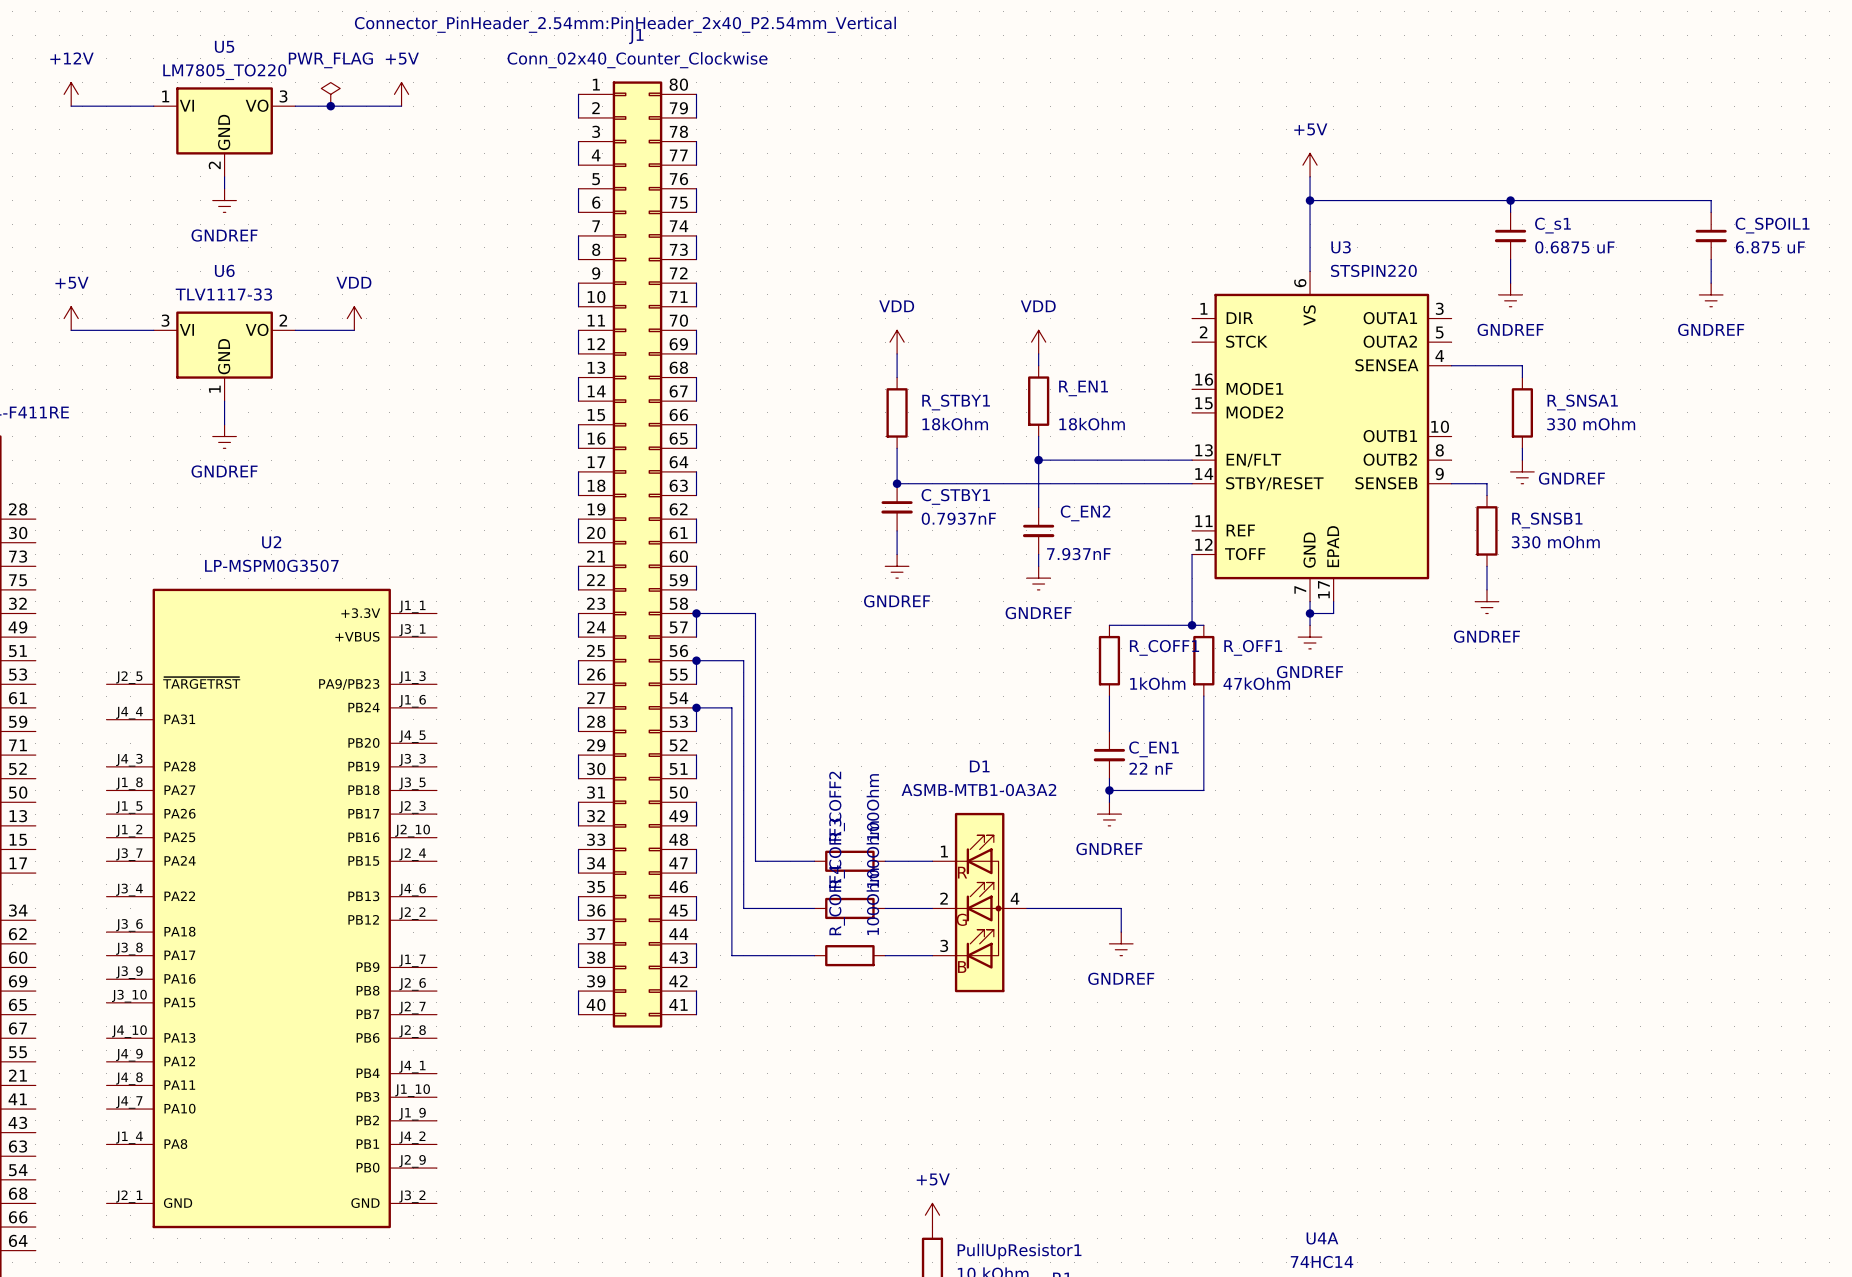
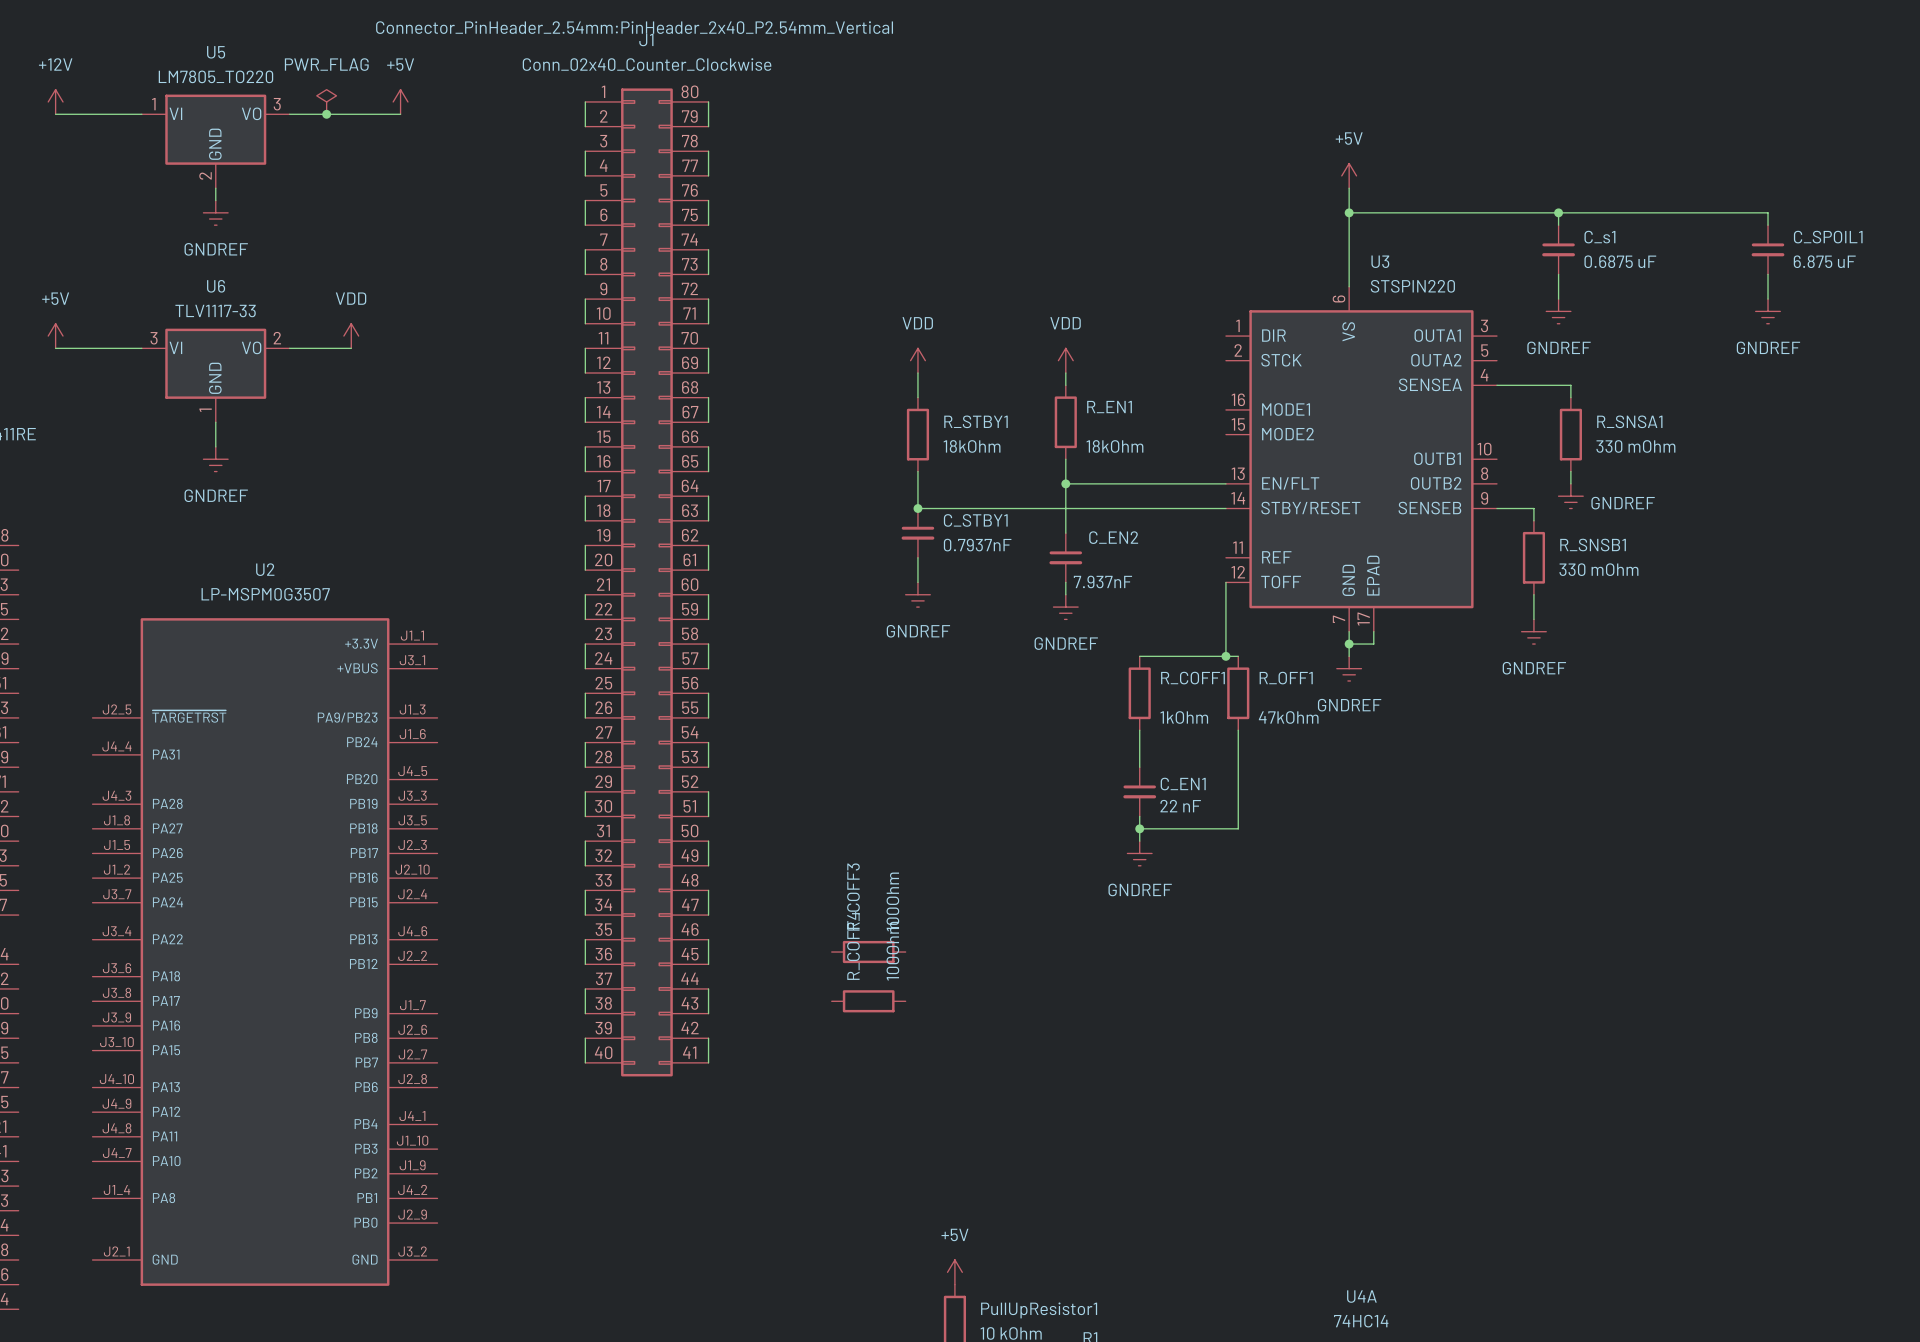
wire: (696, 613) (755, 613) (755, 861) (814, 861) -> none
junction: (696, 613) -> none
wire: (696, 660) (743, 660) (743, 908) (814, 908) -> none
junction: (696, 660) -> none
wire: (696, 707) (731, 707) (731, 955) (814, 955) -> none
junction: (696, 707) -> none
R_COFF2: 100Ohm (849, 861) -> none
wire: (885, 861) (932, 861) -> none
D1: ASMB-MTB1-0A3A2 (979, 902) -> none
wire: (885, 908) (932, 908) -> none
wire: (1026, 908) (1121, 908) (1121, 932) -> none
power symbol: GNDREF (1121, 943) -> none
wire: (885, 955) (932, 955) -> none

